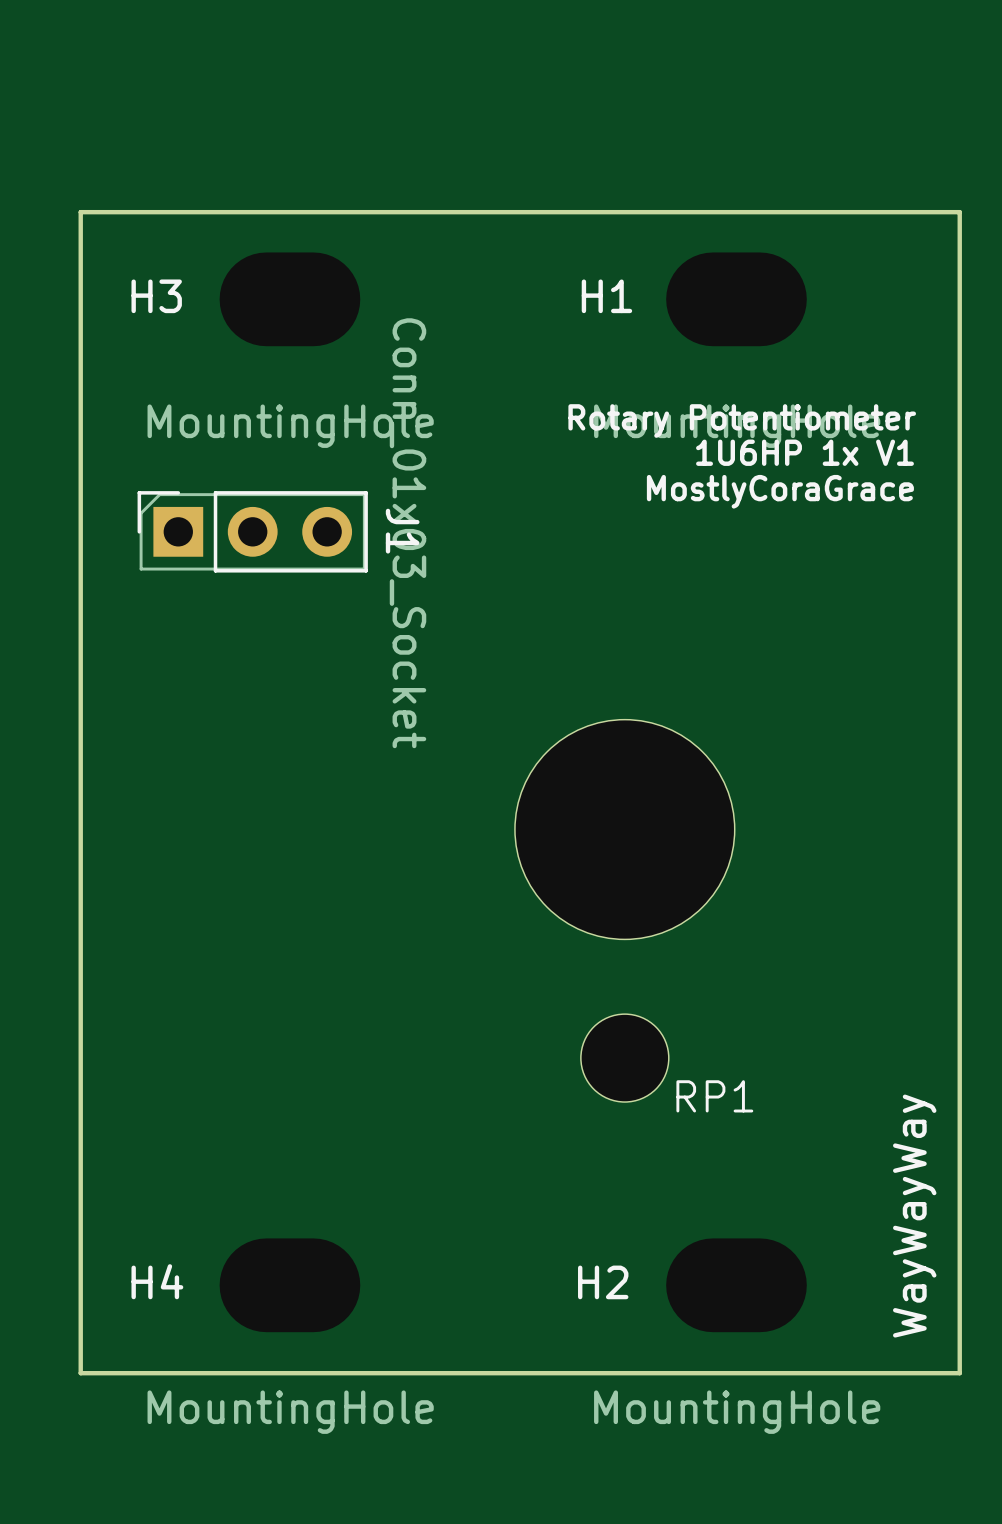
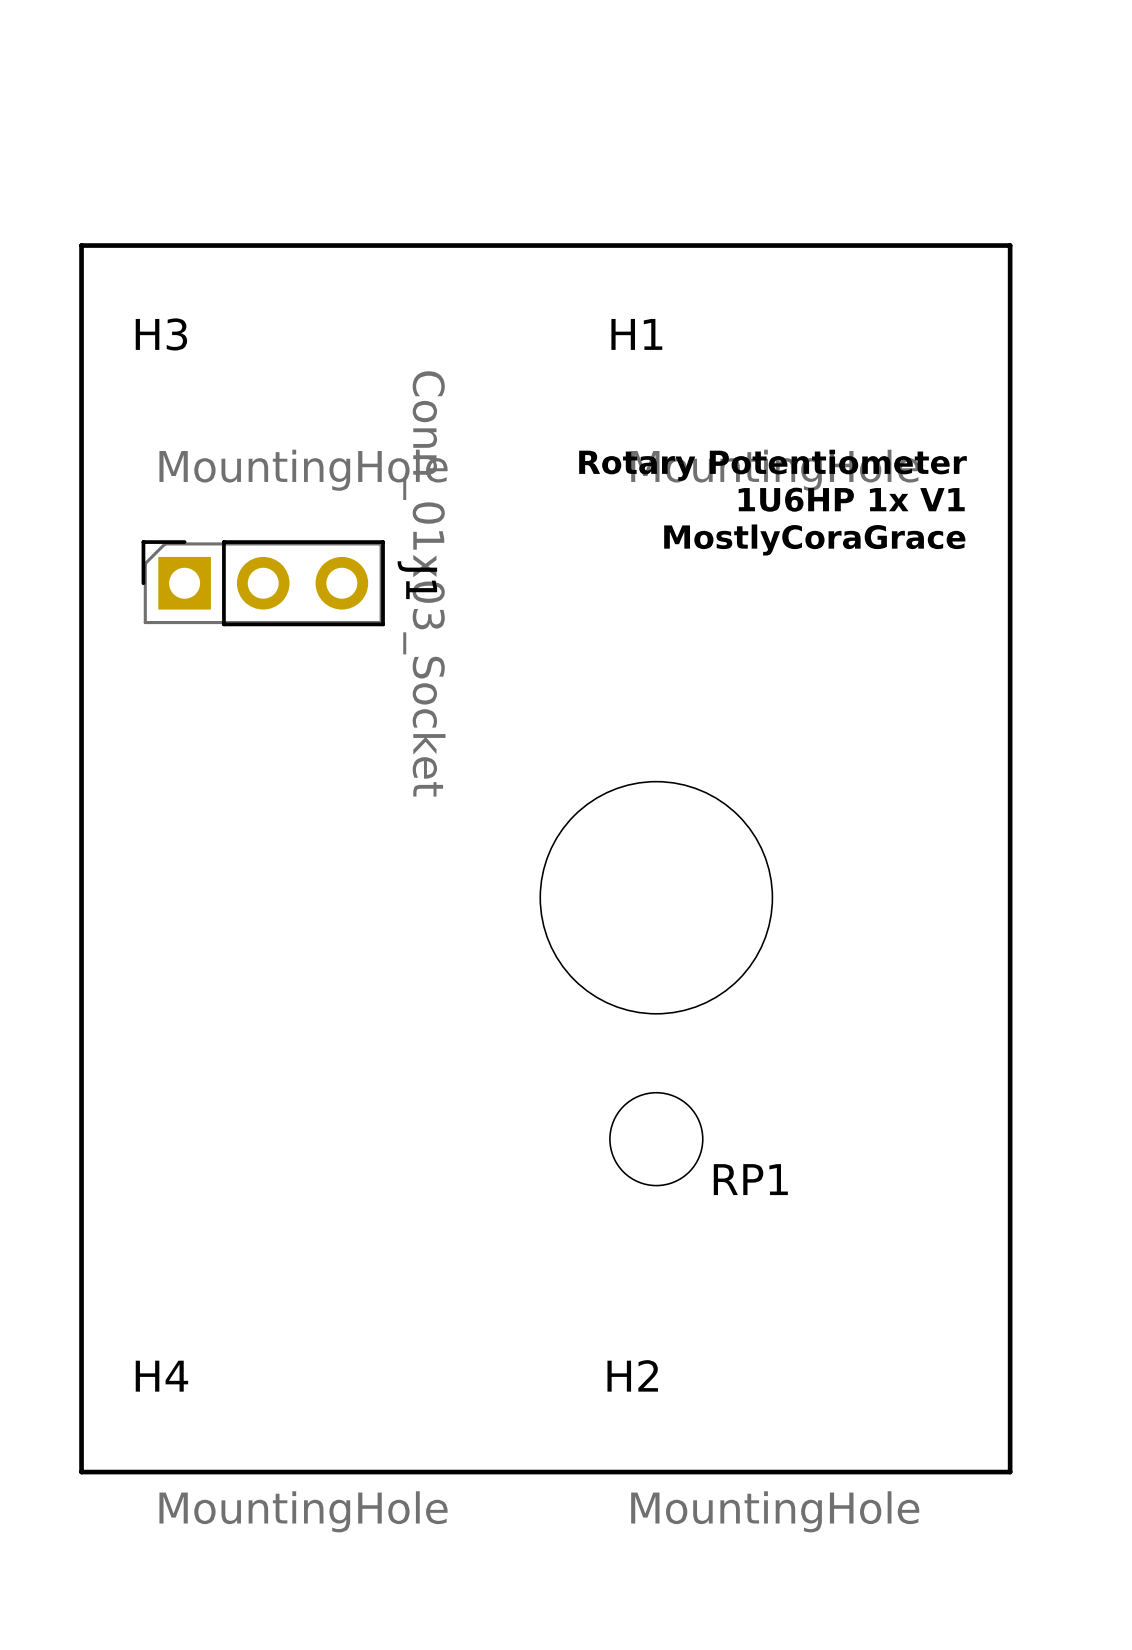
text: WayWayWay (914, 1216) -> none

